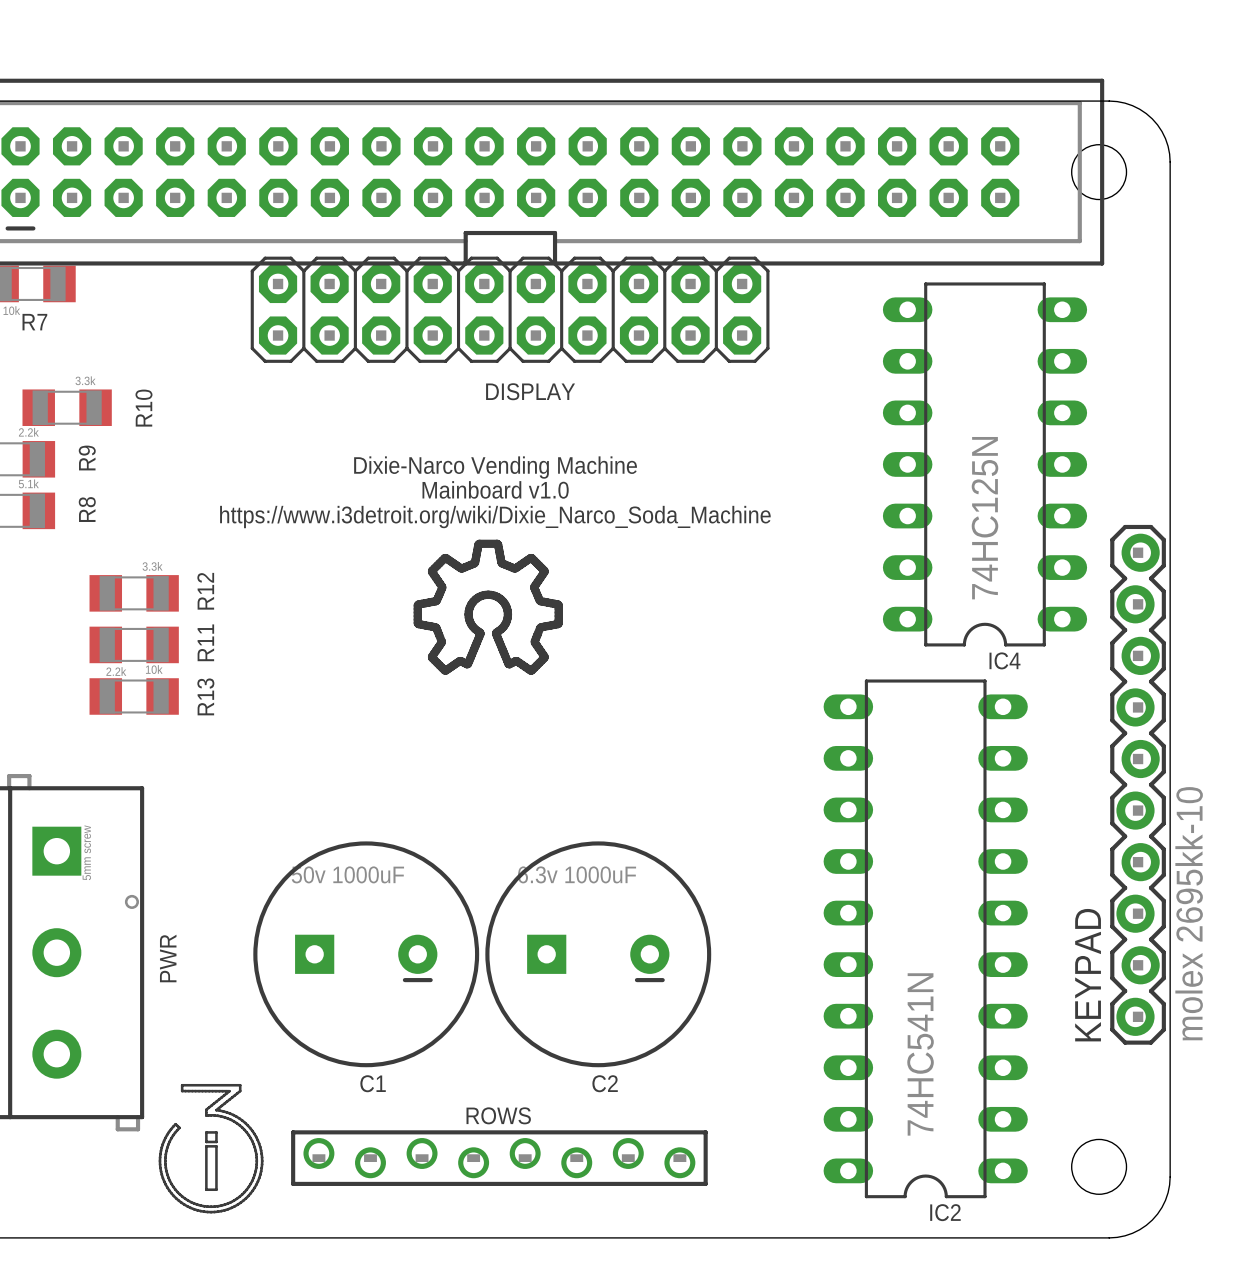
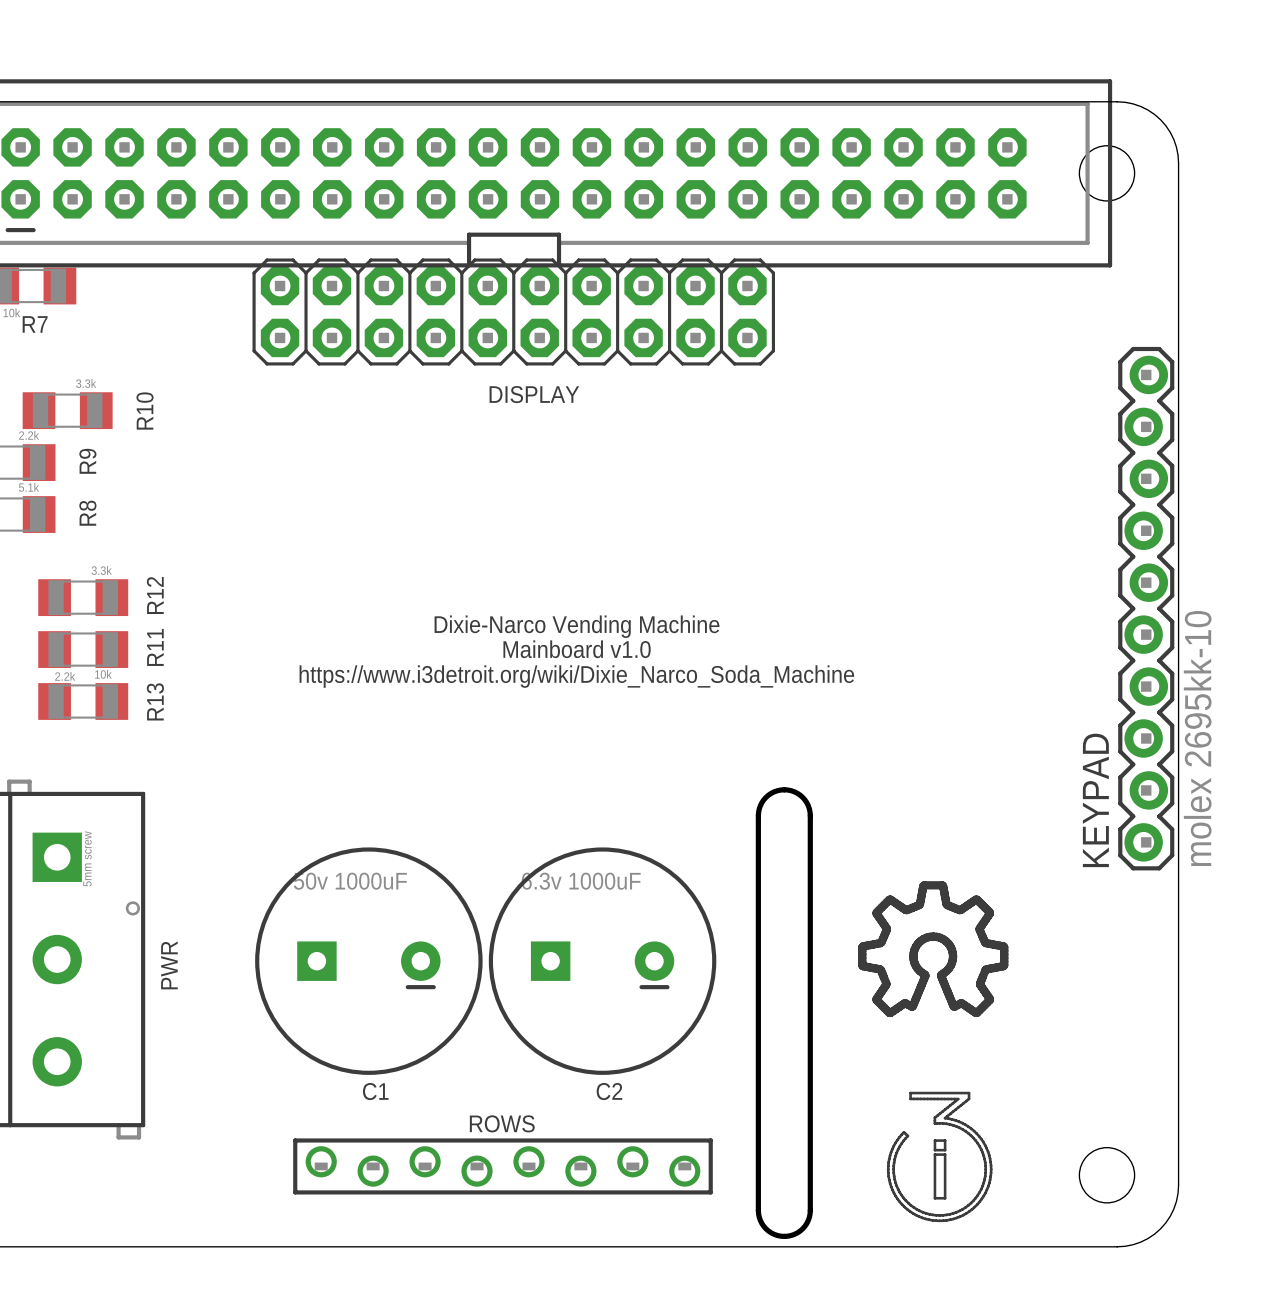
IC4: 74HC125N (985, 464) -> none
text position: Dixie-Narco Vending Machine (495, 467) -> Dixie-Narco Vending Machine (577, 626)
text position: Mainboard v1.0 (495, 489) -> Mainboard v1.0 (577, 649)
text position: https://www.i3detroit.org/wiki/Dixie_Narco_Soda_Machine (495, 517) -> https://www.i3detroit.org/wiki/Dixie_Narco_Soda_Machine (576, 676)
drawing: [413, 539, 563, 675] -> none
R12 position: (134, 593) -> (83, 597)
R11 position: (134, 644) -> (83, 649)
R13 position: (134, 696) -> (83, 701)
board edge: none -> (784, 789) (774, 791) (765, 797) (760, 805) (758, 815) (758, 1210) (760, 1220) (765, 1228) (774, 1234) (784, 1236) (794, 1234) (802, 1228) (808, 1220) (810, 1210) (810, 815) (808, 805) (802, 797) (794, 791) (784, 789)
KEYPAD position: (1138, 784) -> (1146, 608)
drawing: none -> [858, 881, 1009, 1018]
IC2: 74HC541N (925, 938) -> none
drawing: [158, 1083, 264, 1214] -> none
drawing: none -> [886, 1091, 993, 1223]

